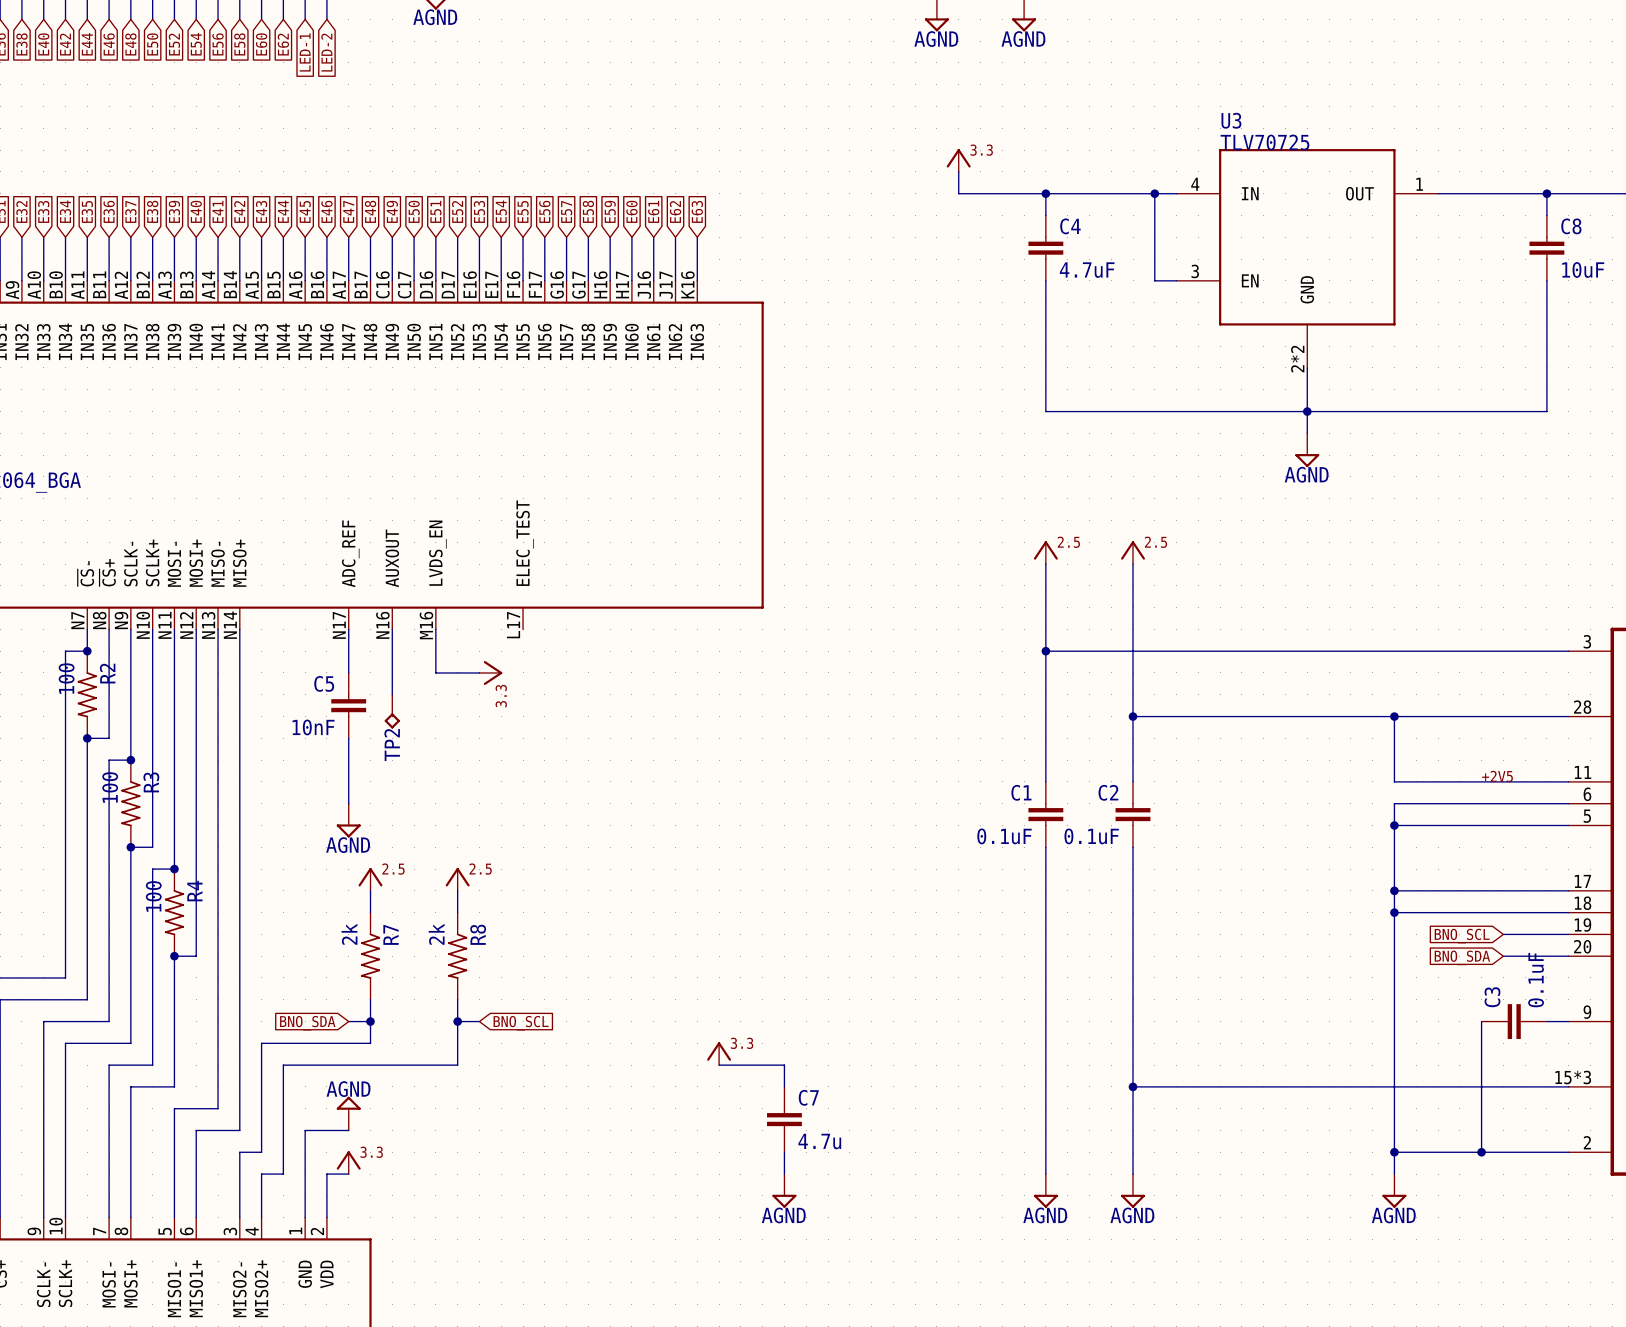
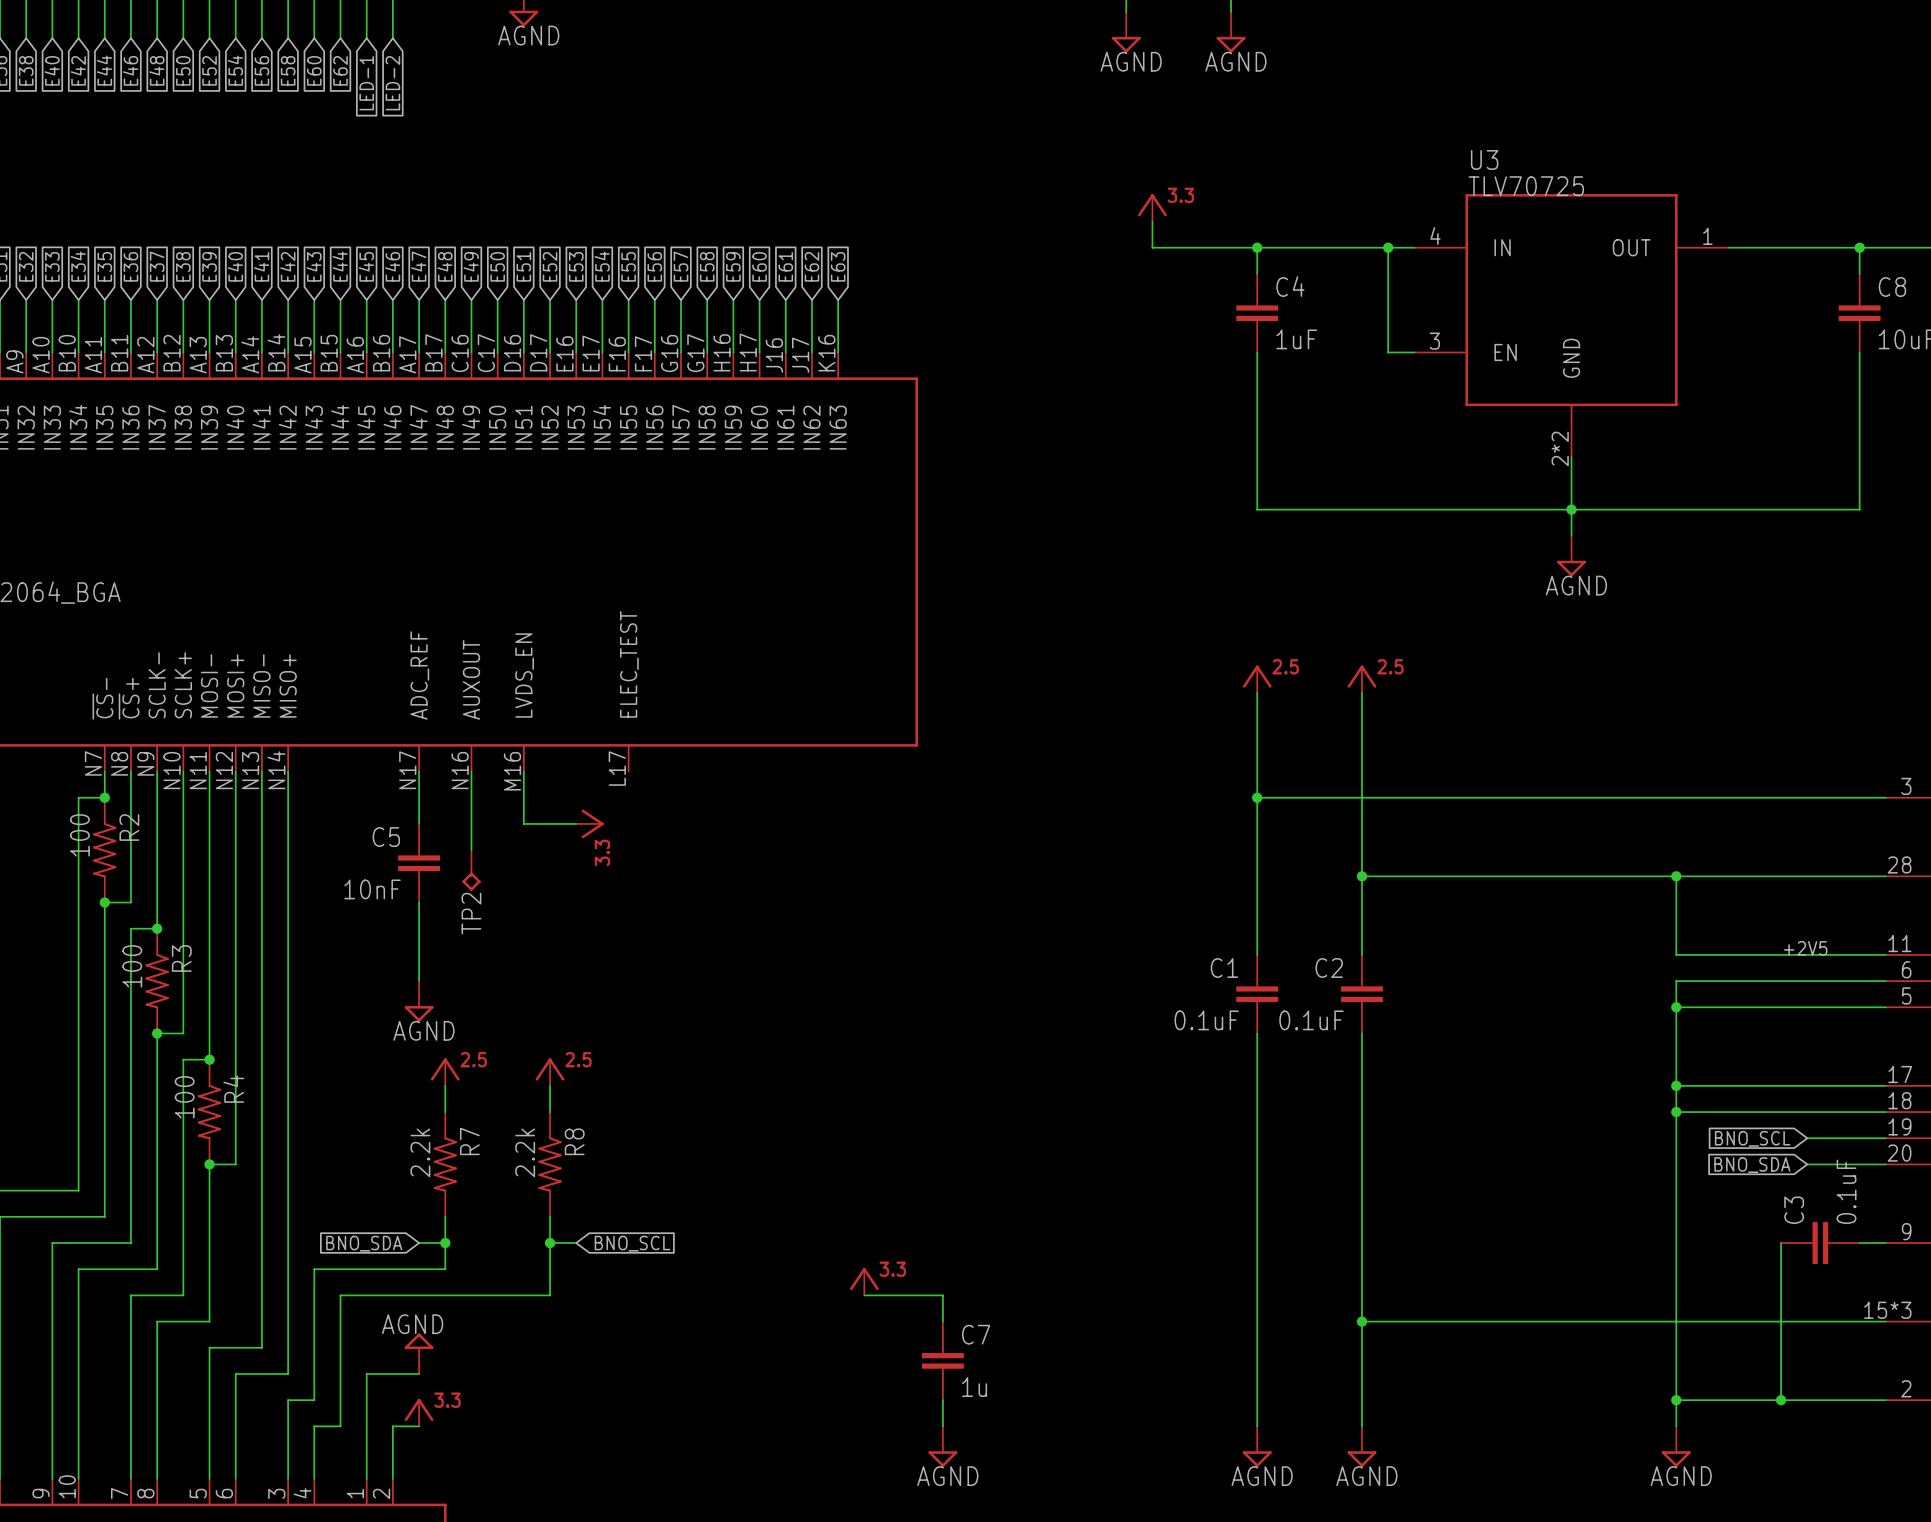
C4 value: 4.7uF (1087, 270) -> 1uF (1296, 339)
R7 value: 2k (349, 934) -> 2.2k (420, 1152)
R8 value: 2k (436, 934) -> 2.2k (525, 1152)
C7 value: 4.7u (819, 1141) -> 1u (974, 1387)

